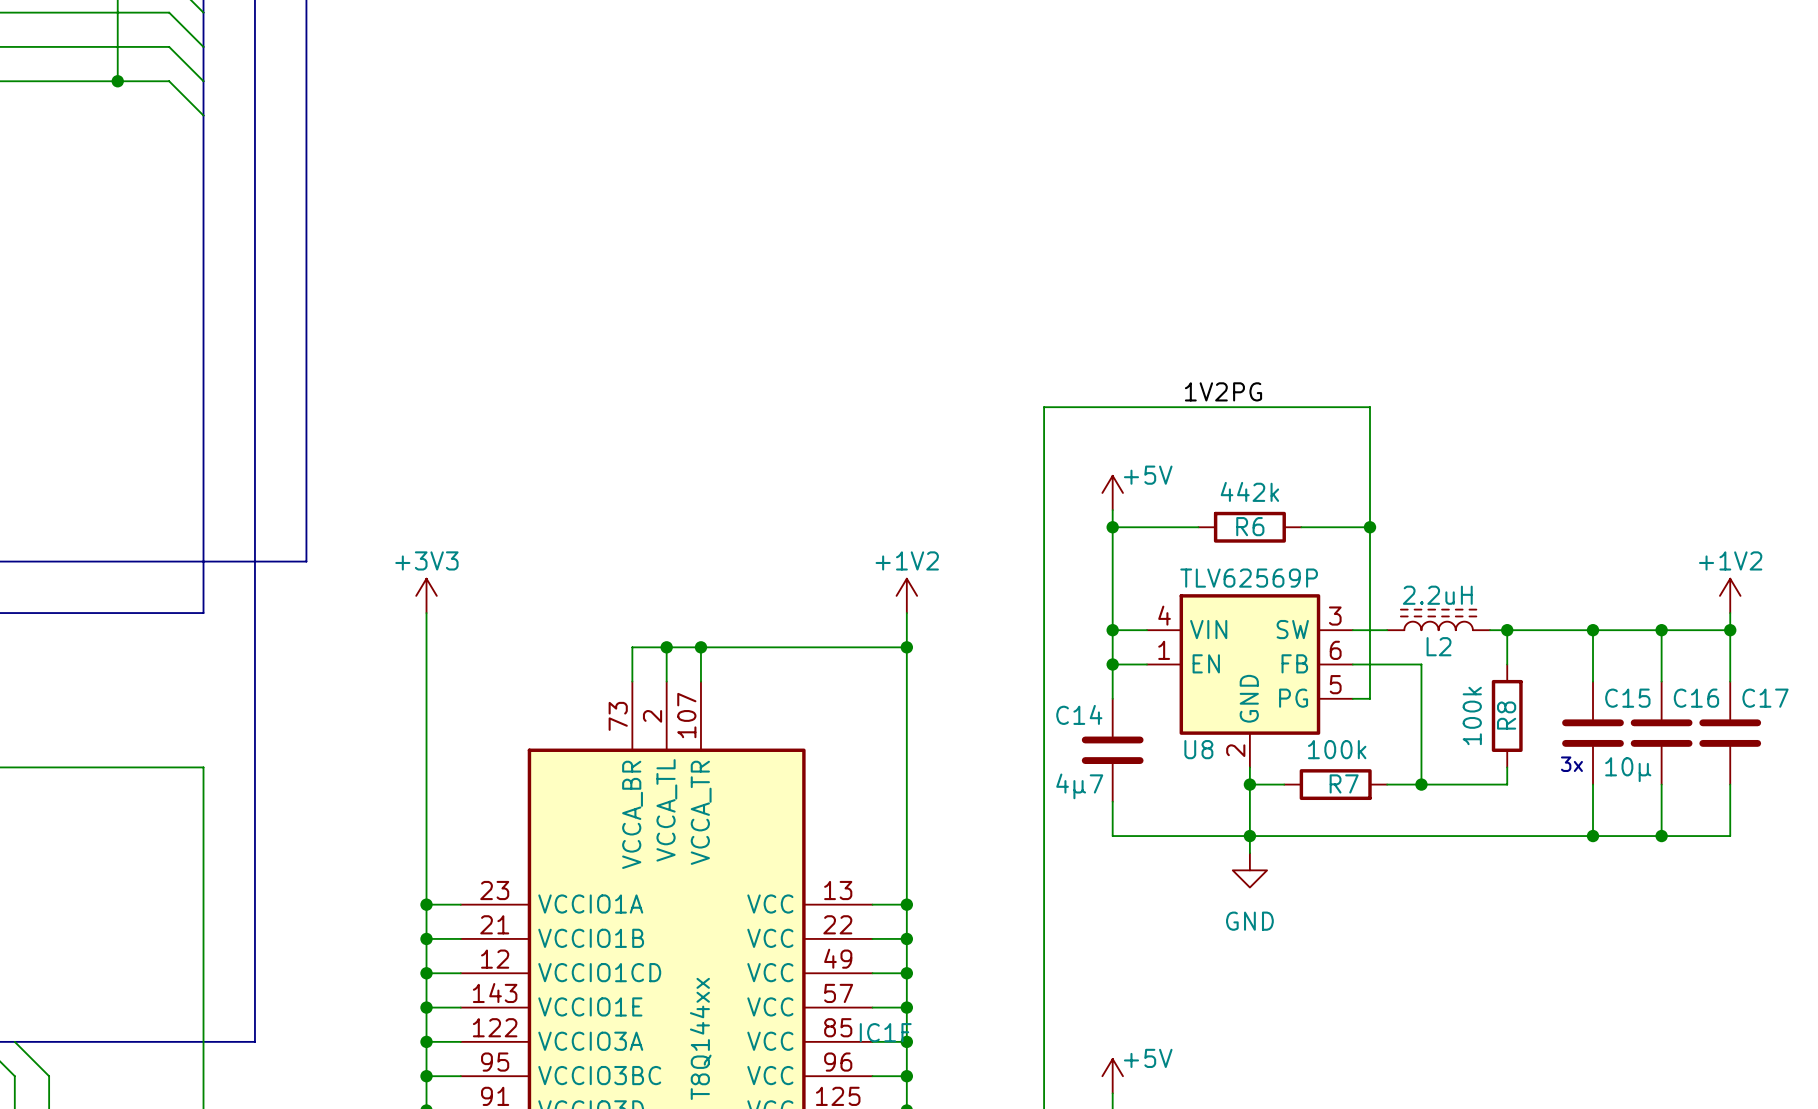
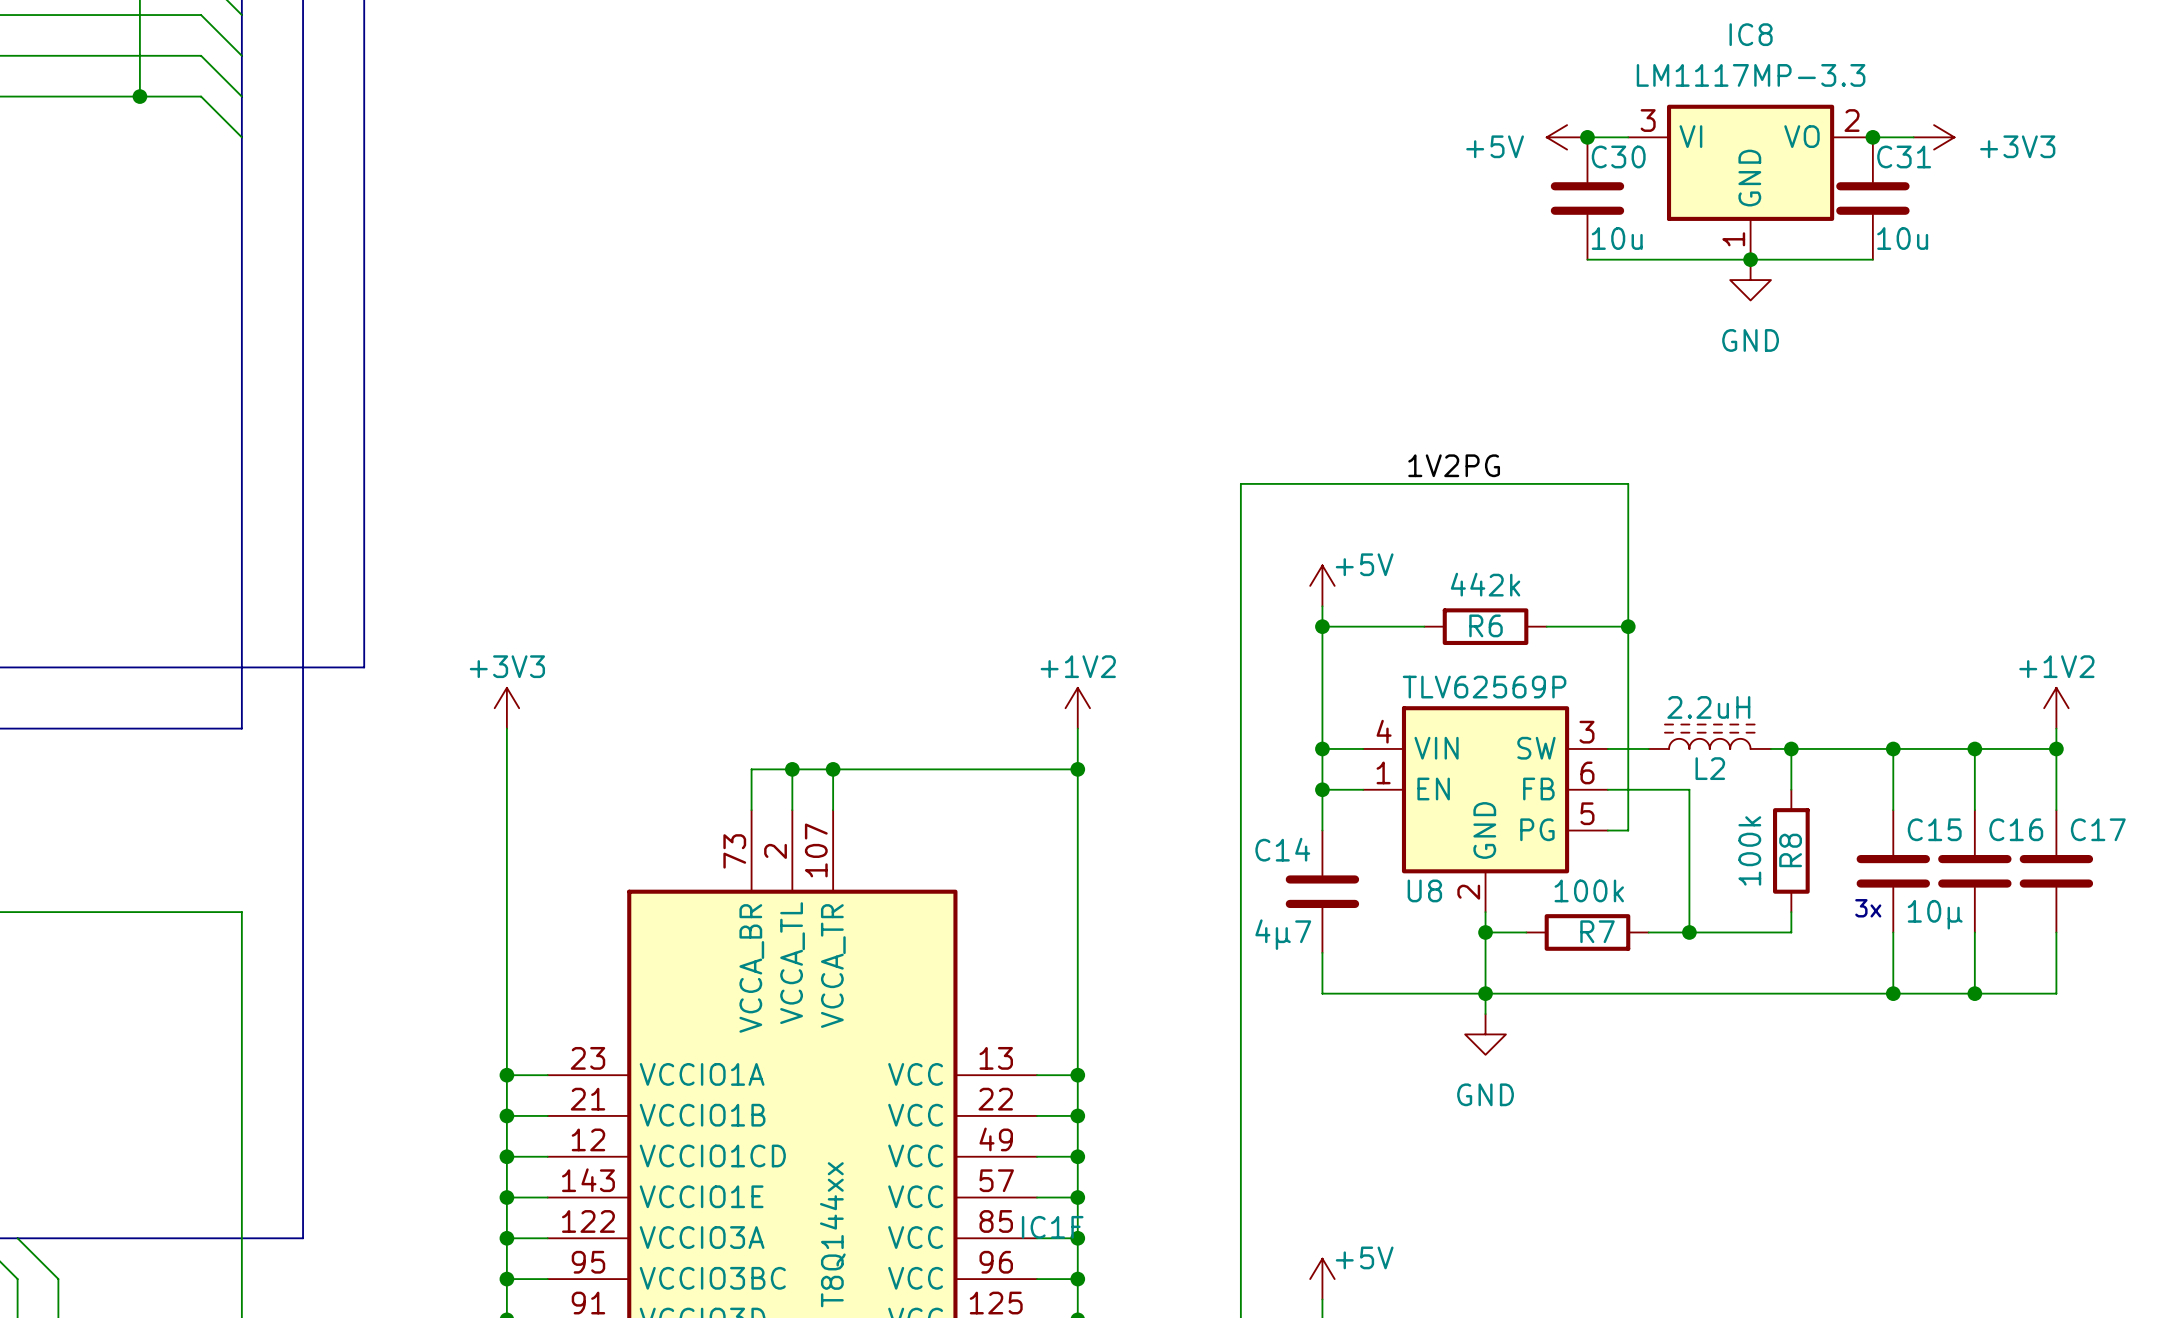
power symbol: none -> +5V (1567, 137)
wire: none -> (1587, 137) (1628, 137)
junction: none -> (1587, 137)
wire: none -> (1872, 137) (1913, 137)
junction: none -> (1872, 137)
power symbol: none -> +3V3 (1934, 137)
IC8: none -> LM1117MP-3.3 (1750, 182)
C30: none -> 10u (1587, 198)
C31: none -> 10u (1872, 198)
wire: none -> (1587, 259) (1872, 259)
junction: none -> (1750, 259)
power symbol: none -> GND (1750, 280)

